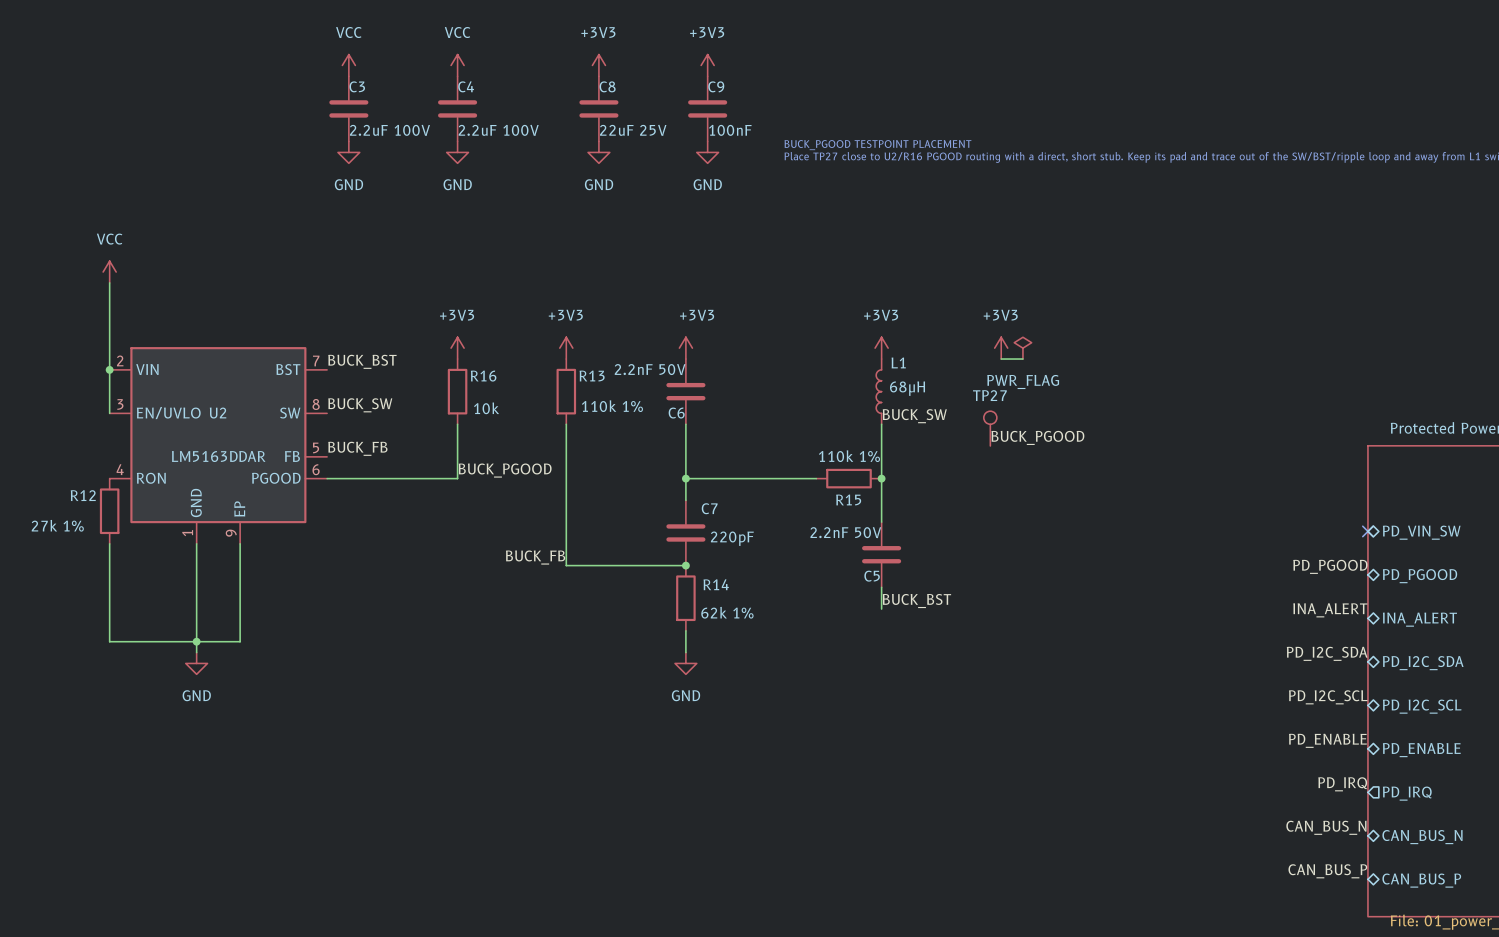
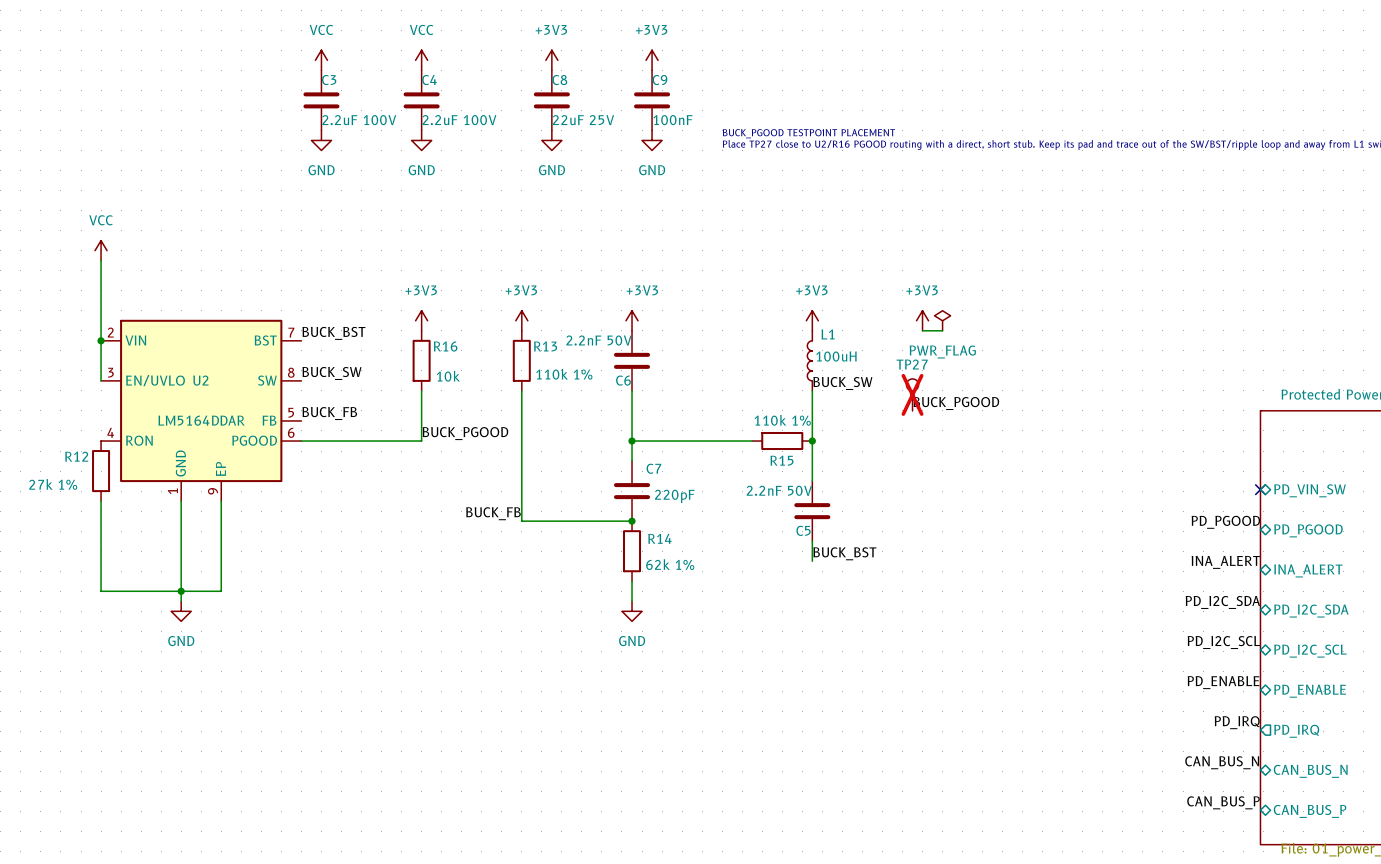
L1 value: 68μH (907, 388) -> 100uH (836, 356)
TP27 do-not-place cross: none -> (912, 394)
U2 value: LM5163DDAR (218, 456) -> LM5164DDAR (201, 420)

